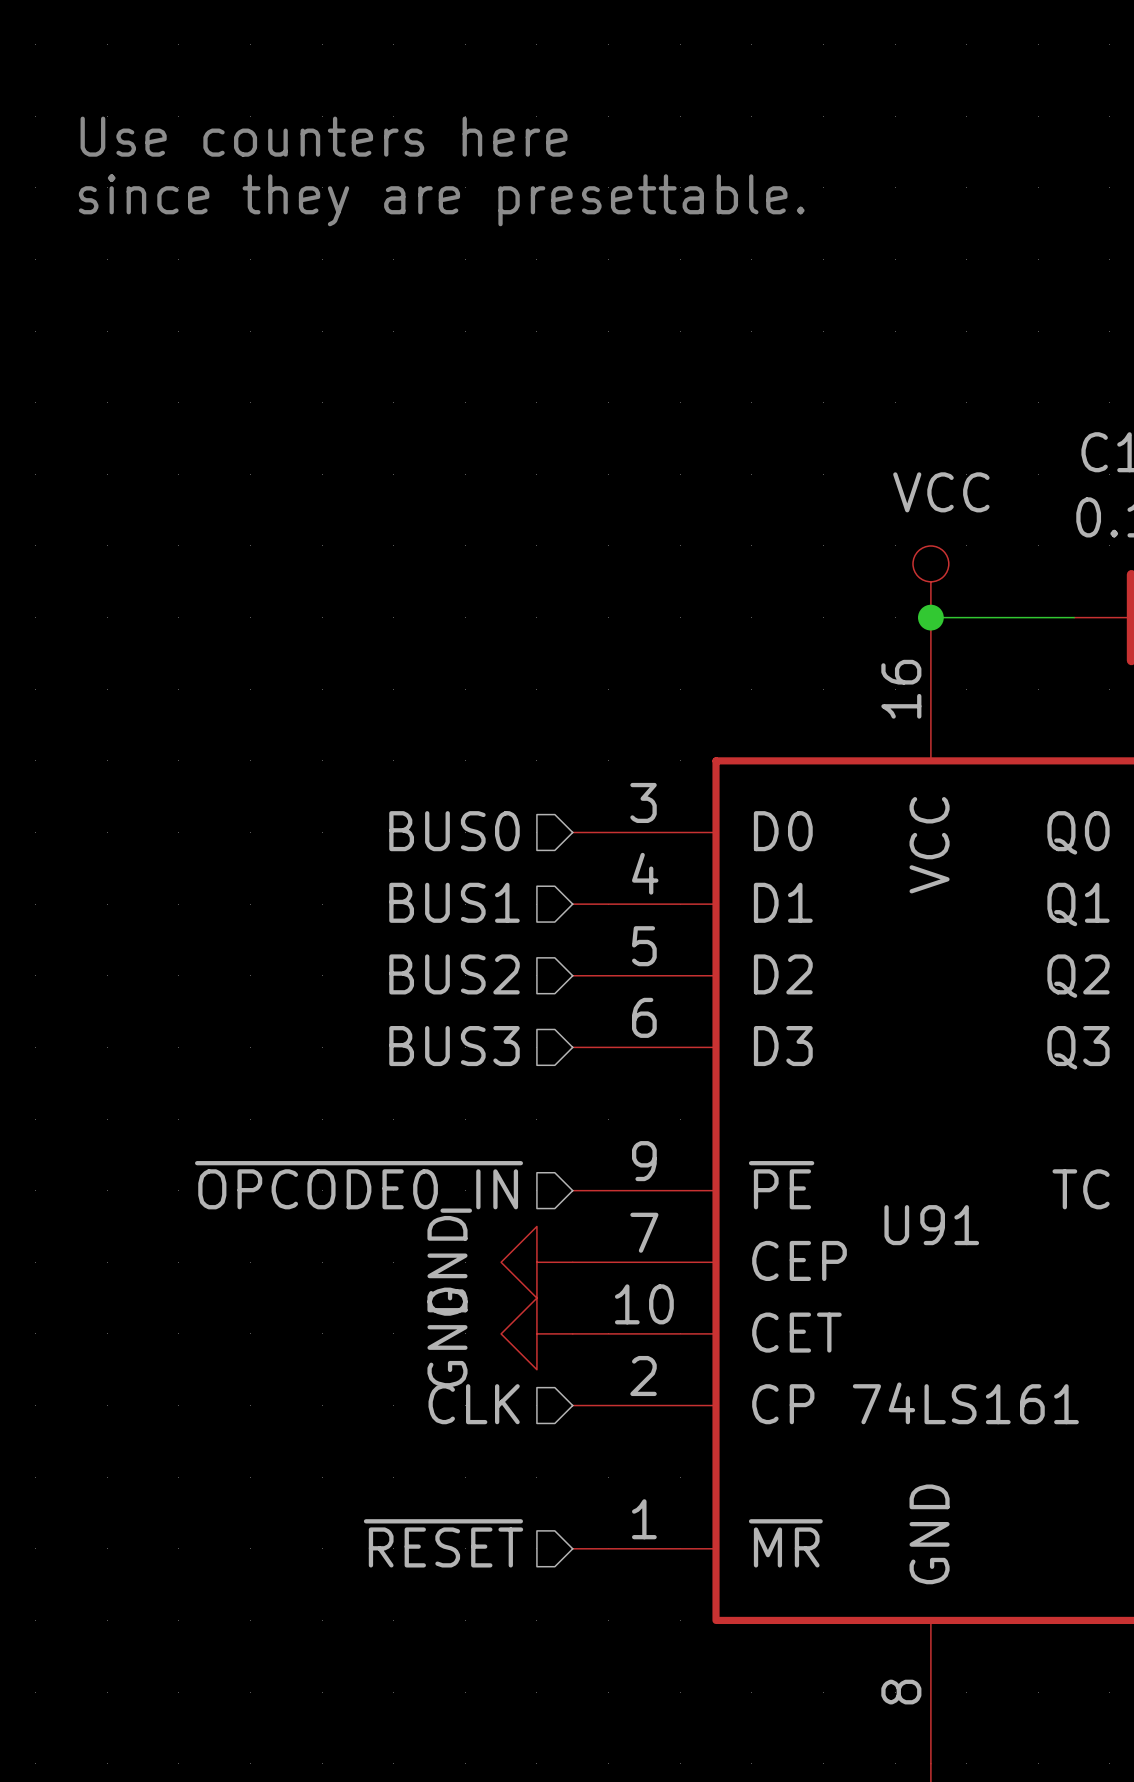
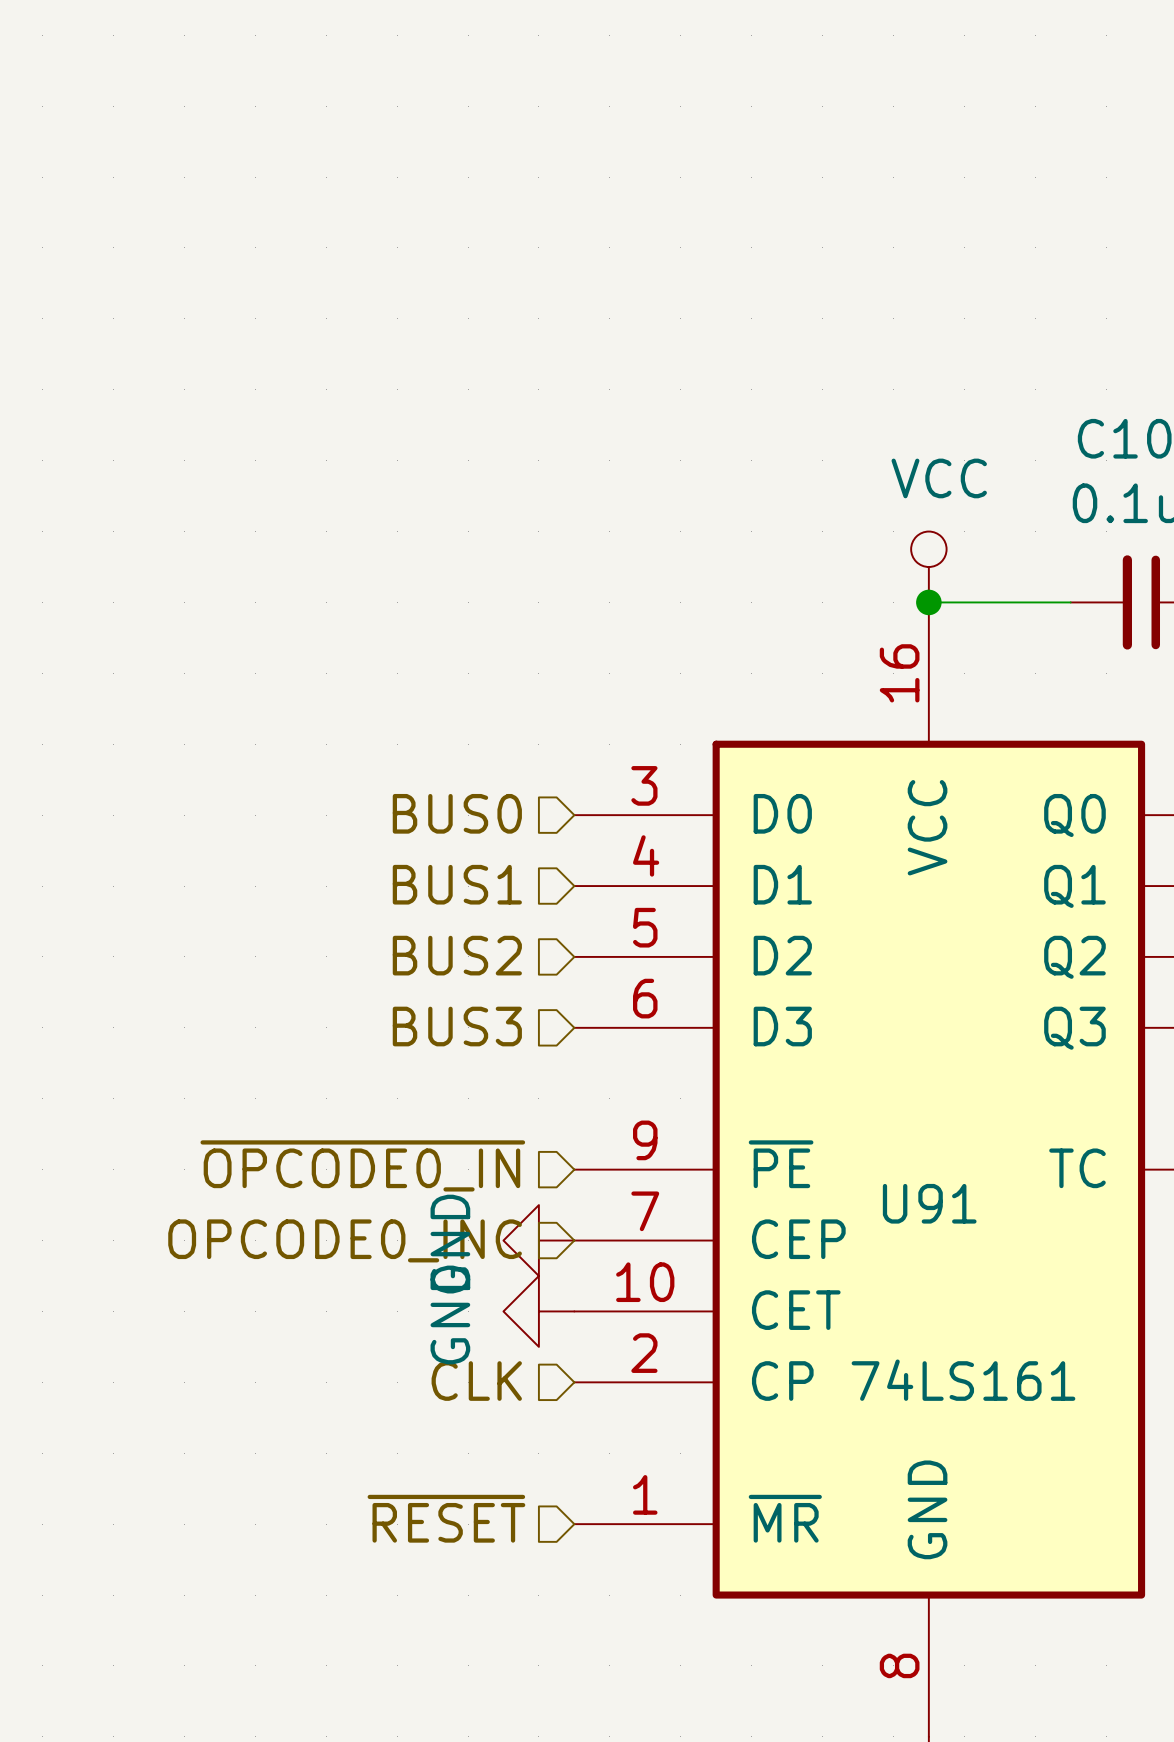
text: Use counters here (324, 136) -> none
text: since they are presettable. (441, 200) -> none
hierarchical label: none -> OPCODE0_INC (345, 1240)

